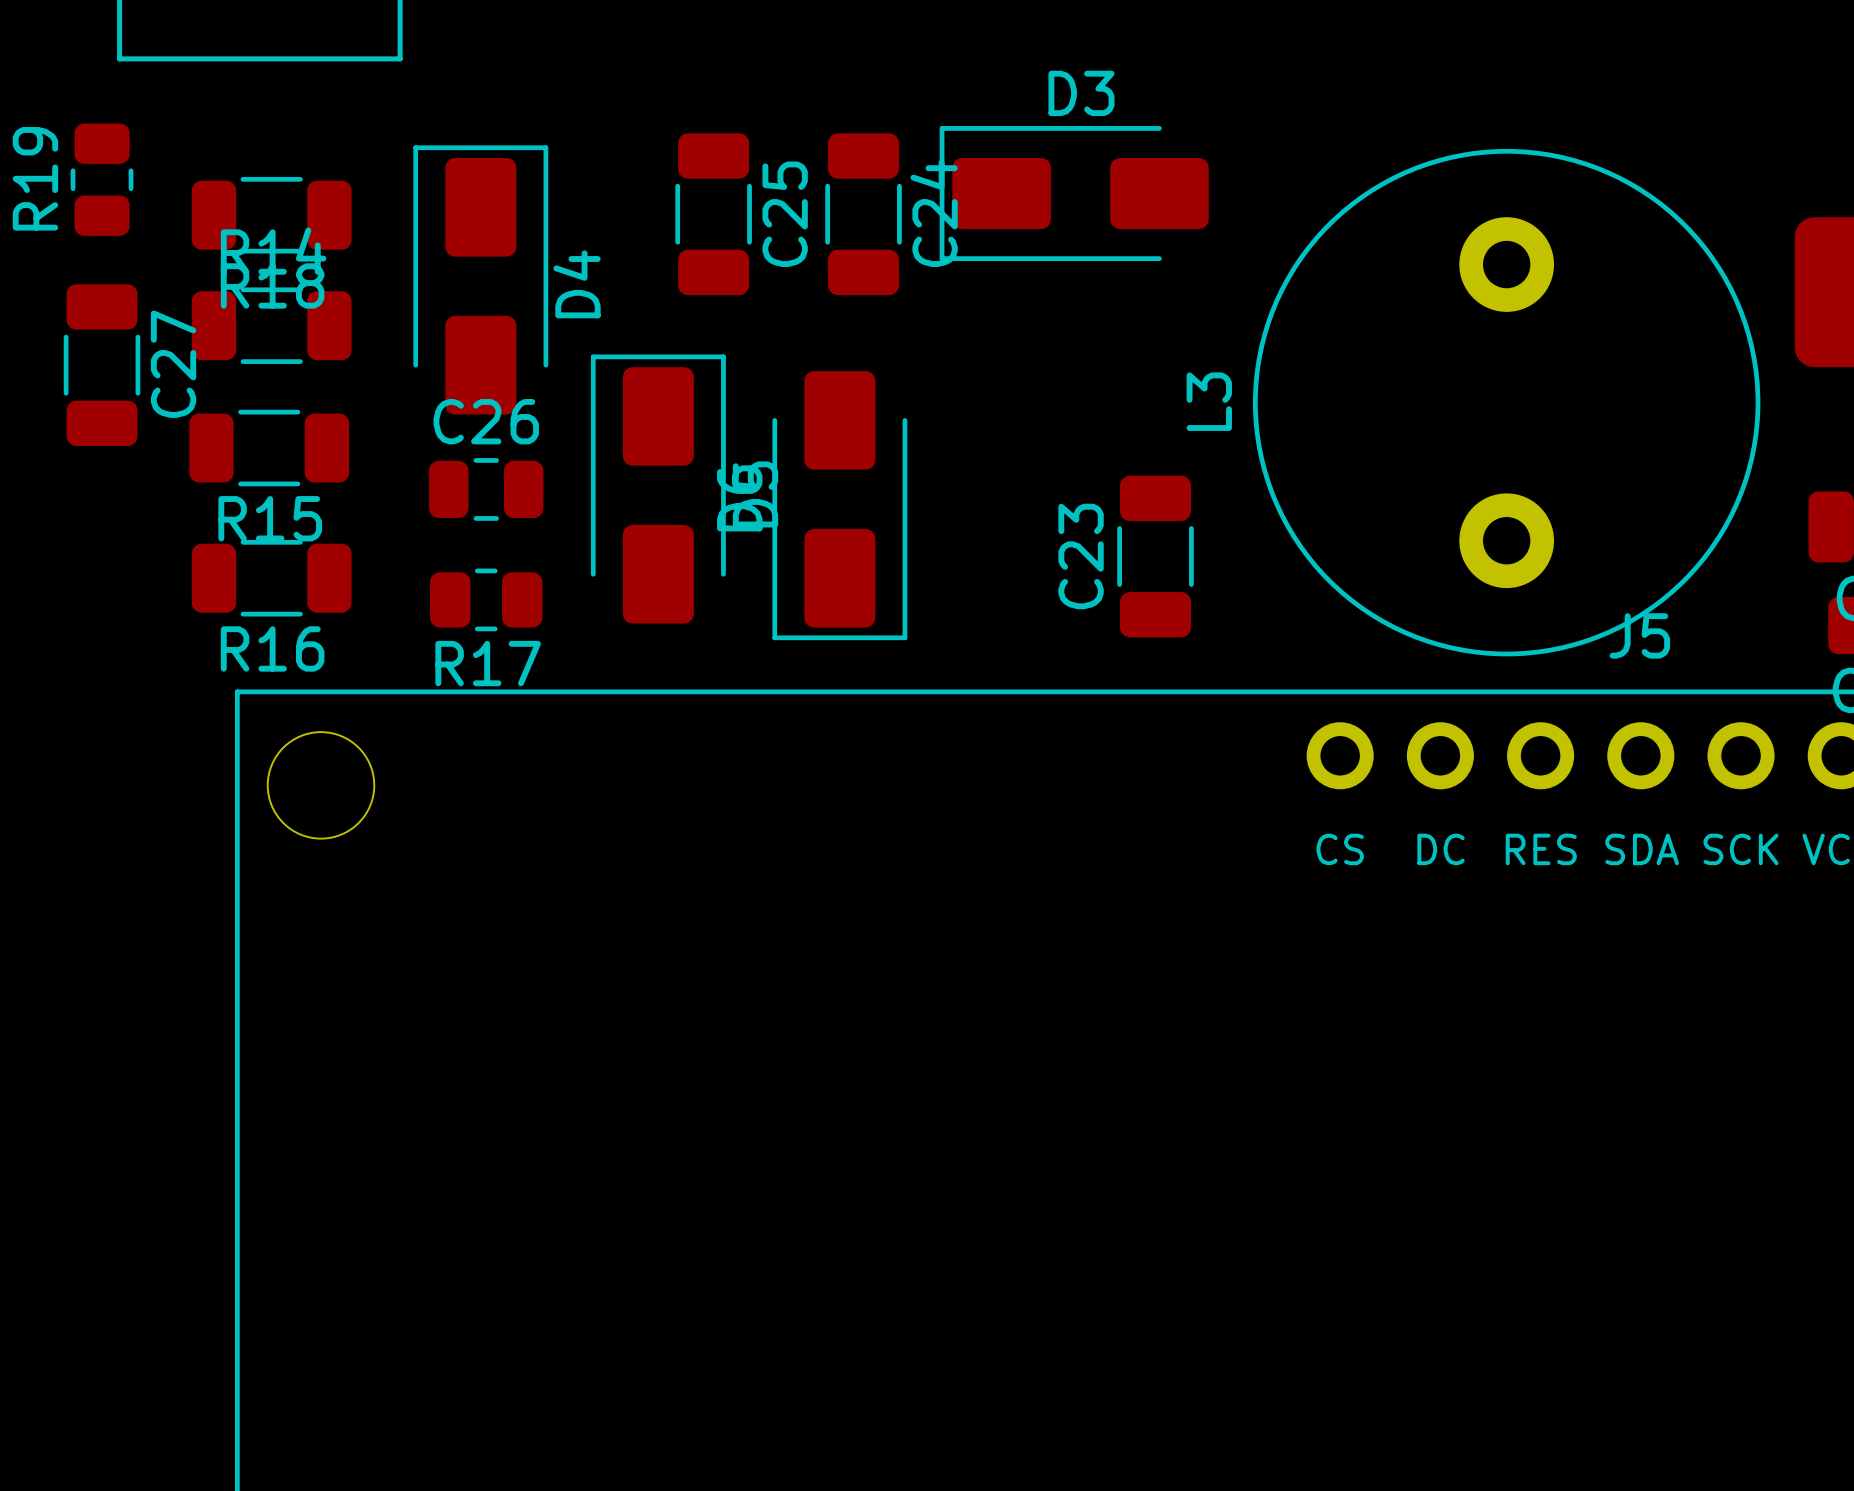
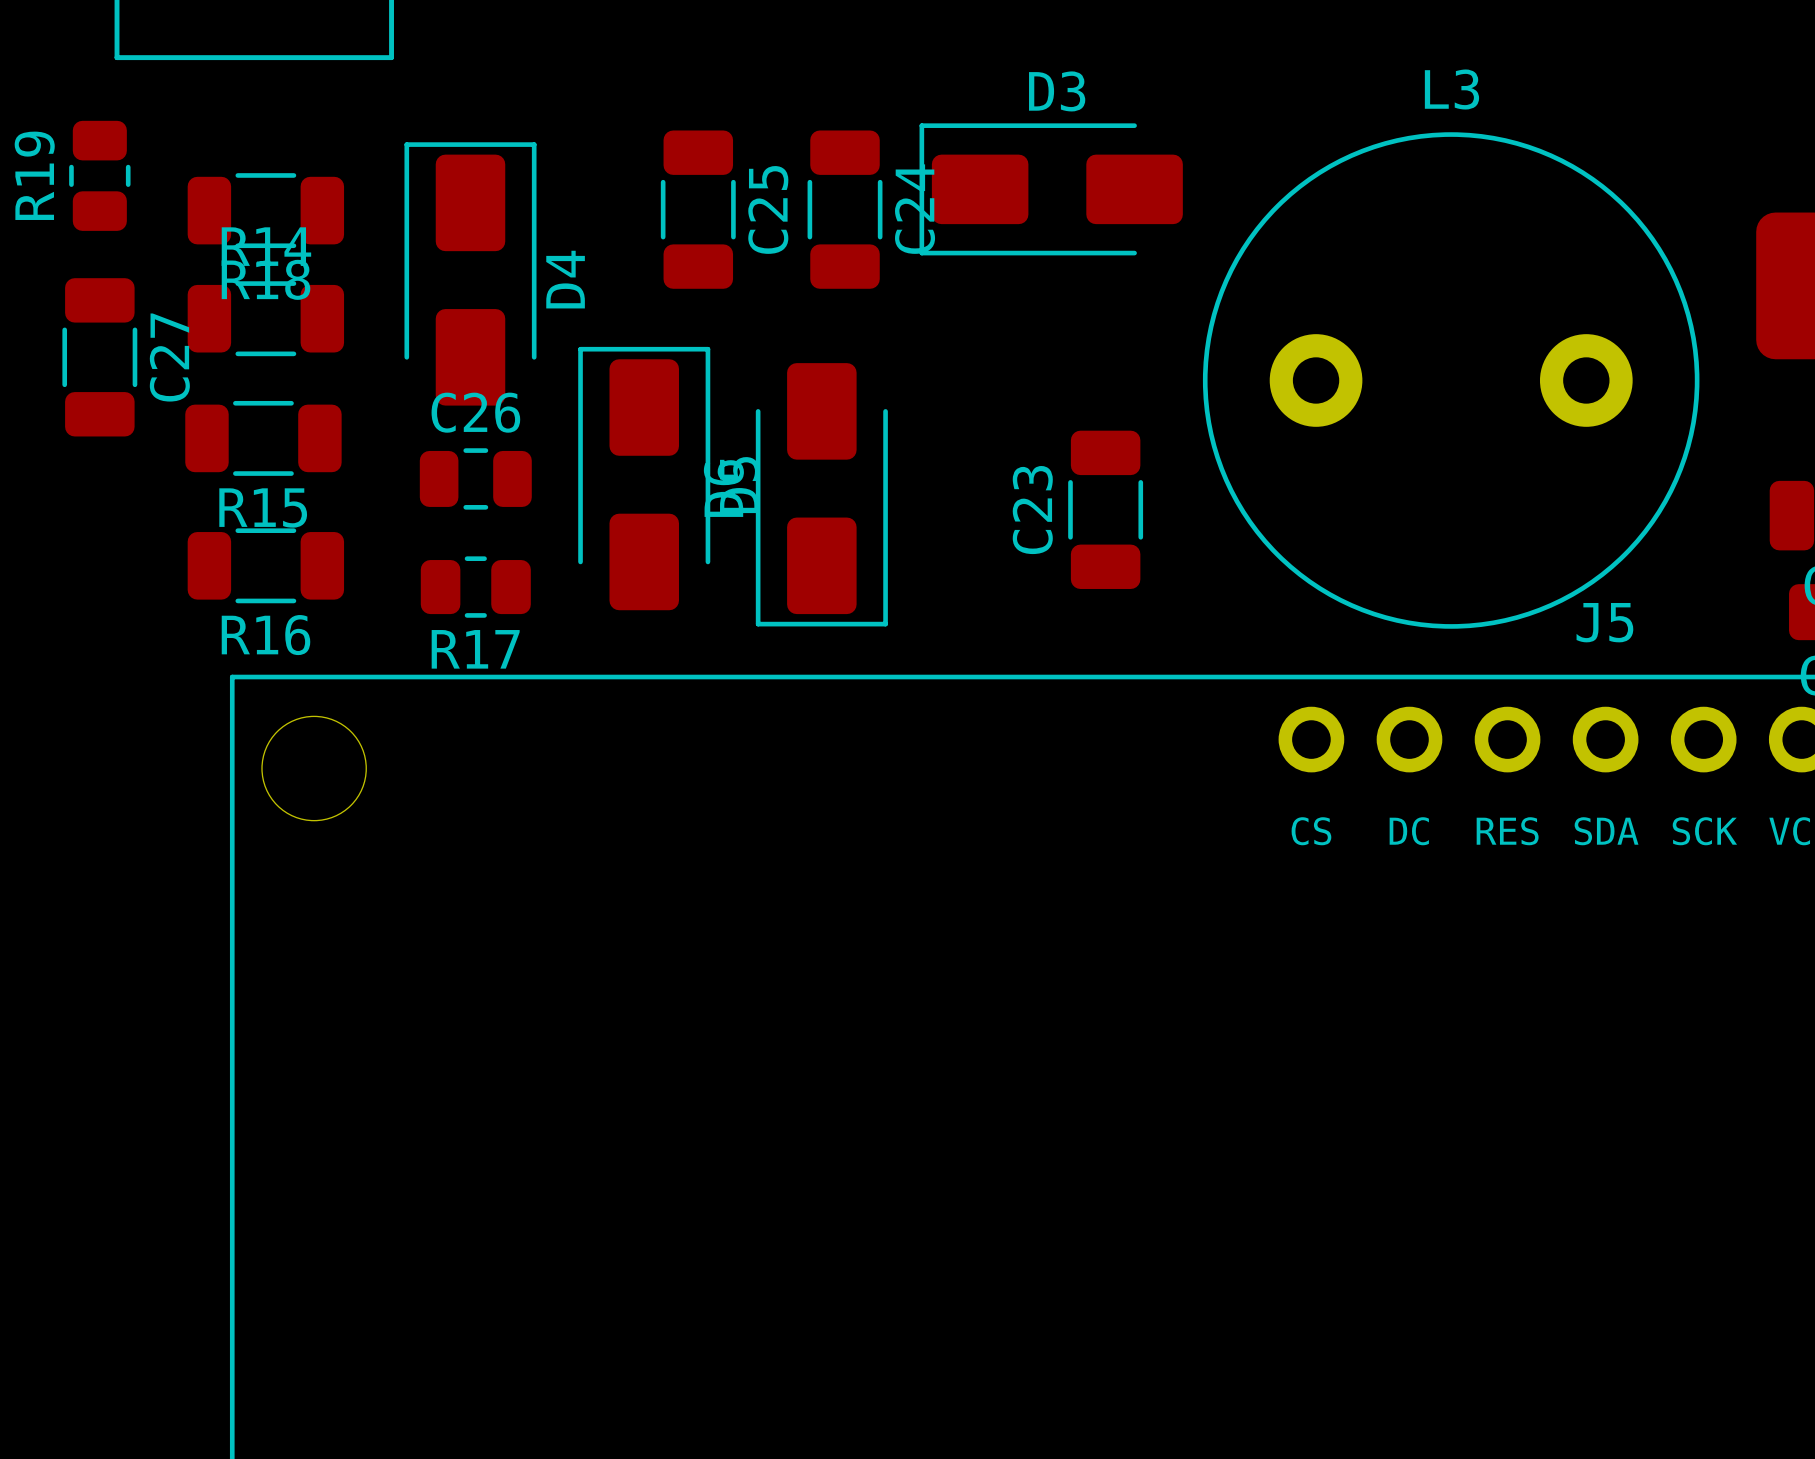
L3 rotation: 0° (1506, 402) -> 90° clockwise (1451, 380)
C23 position: (1155, 556) -> (1105, 509)

